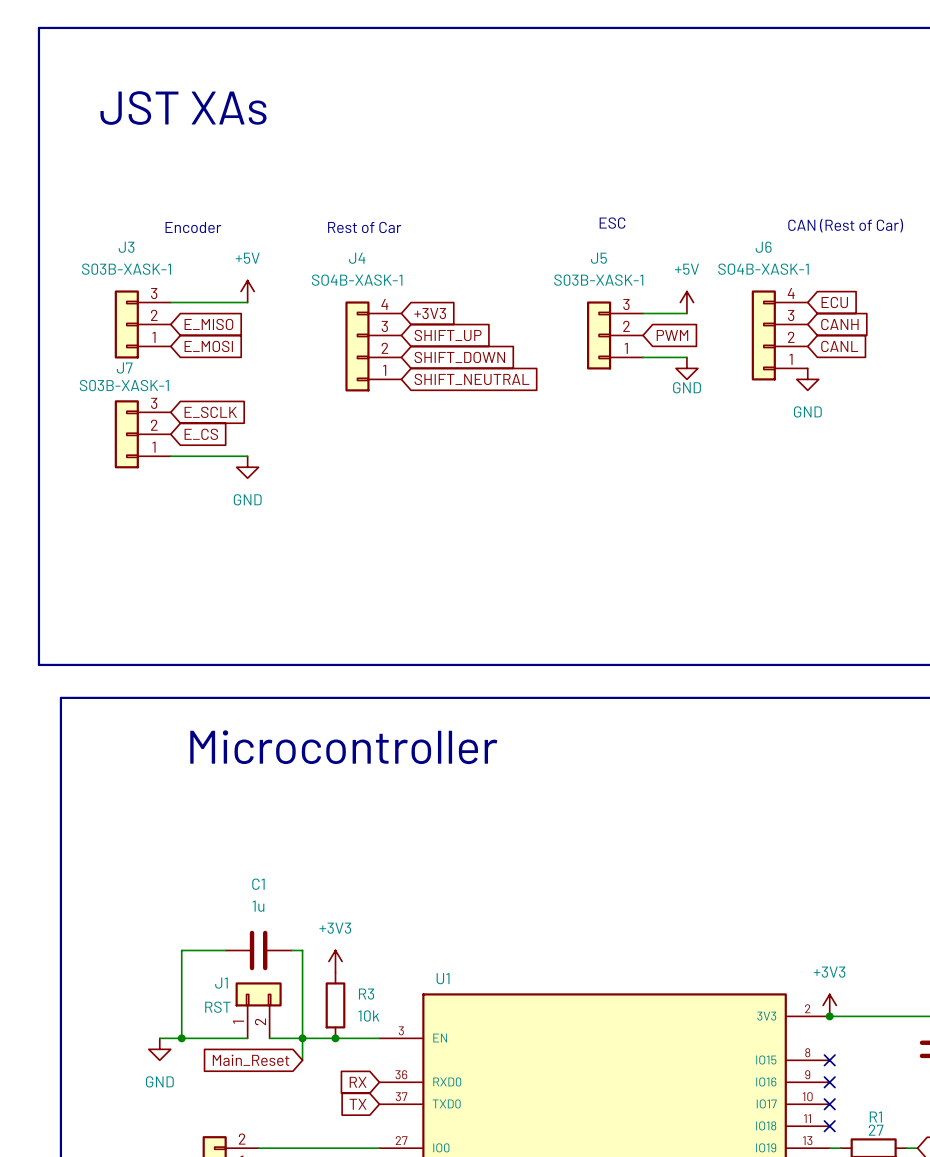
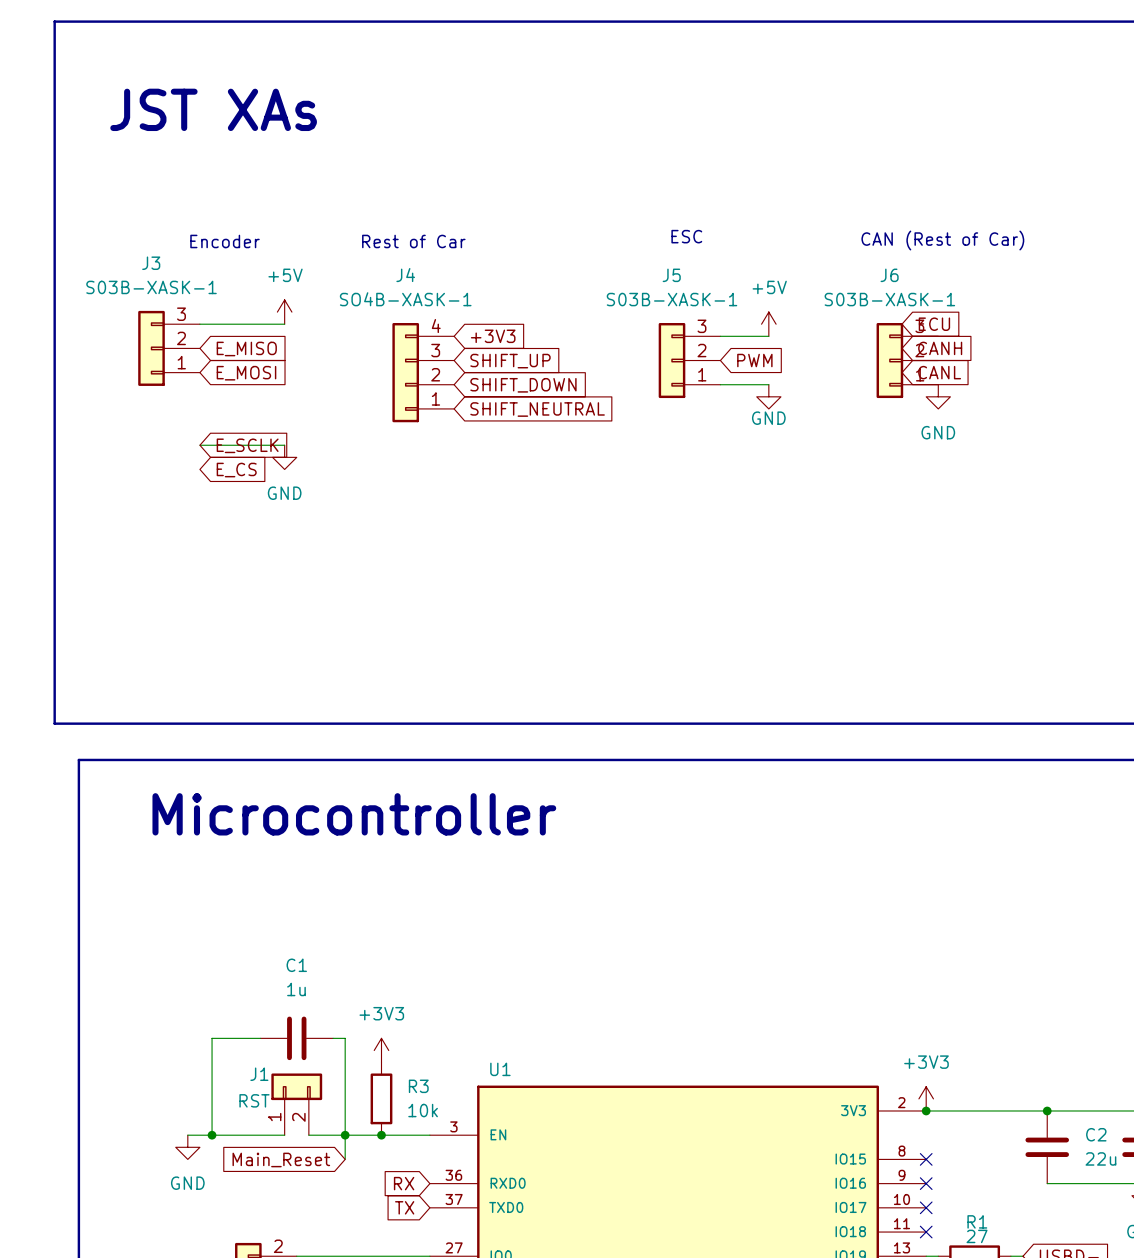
J6 value: SO4B-XASK-1 (763, 269) -> S03B-XASK-1 (889, 299)
J6 symbol: [751, 290, 808, 381] -> [876, 322, 939, 399]
power symbol position: GND (807, 379) -> GND (938, 396)
J7: S03B-XASK-1 (142, 434) -> none
wire: (170, 456) (247, 456) -> (199, 445) (284, 445)
power symbol position: GND (247, 467) -> GND (284, 457)

